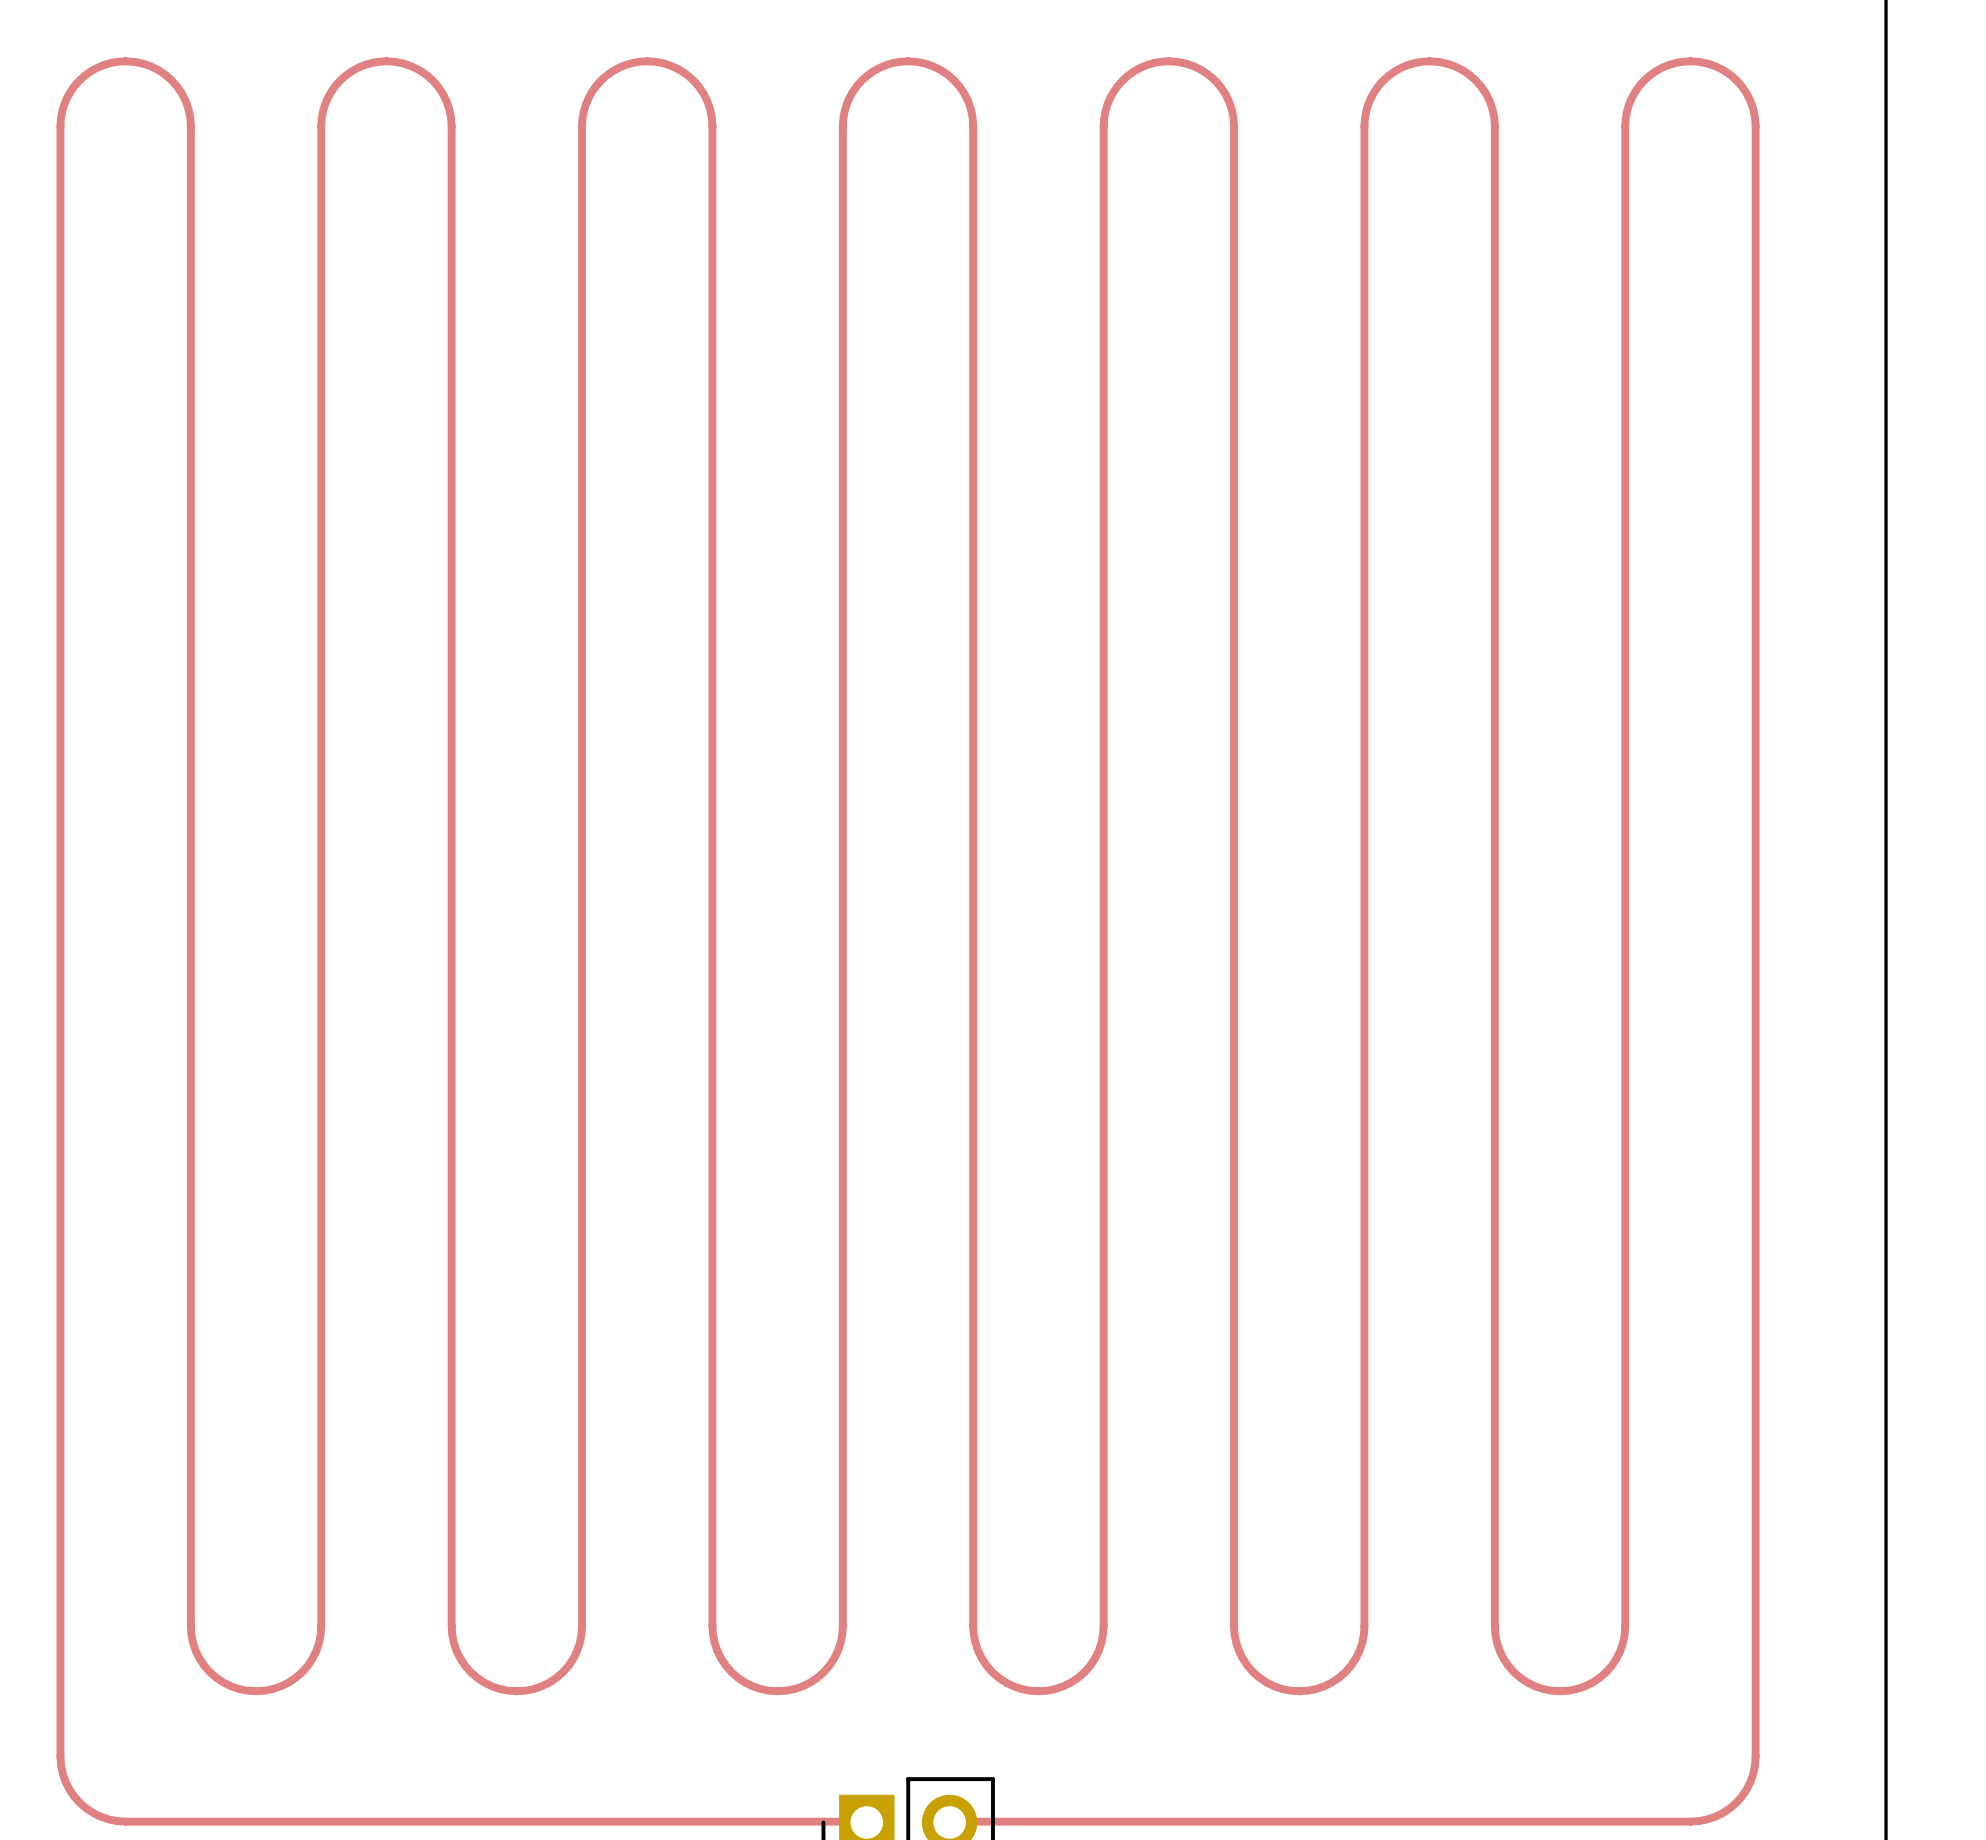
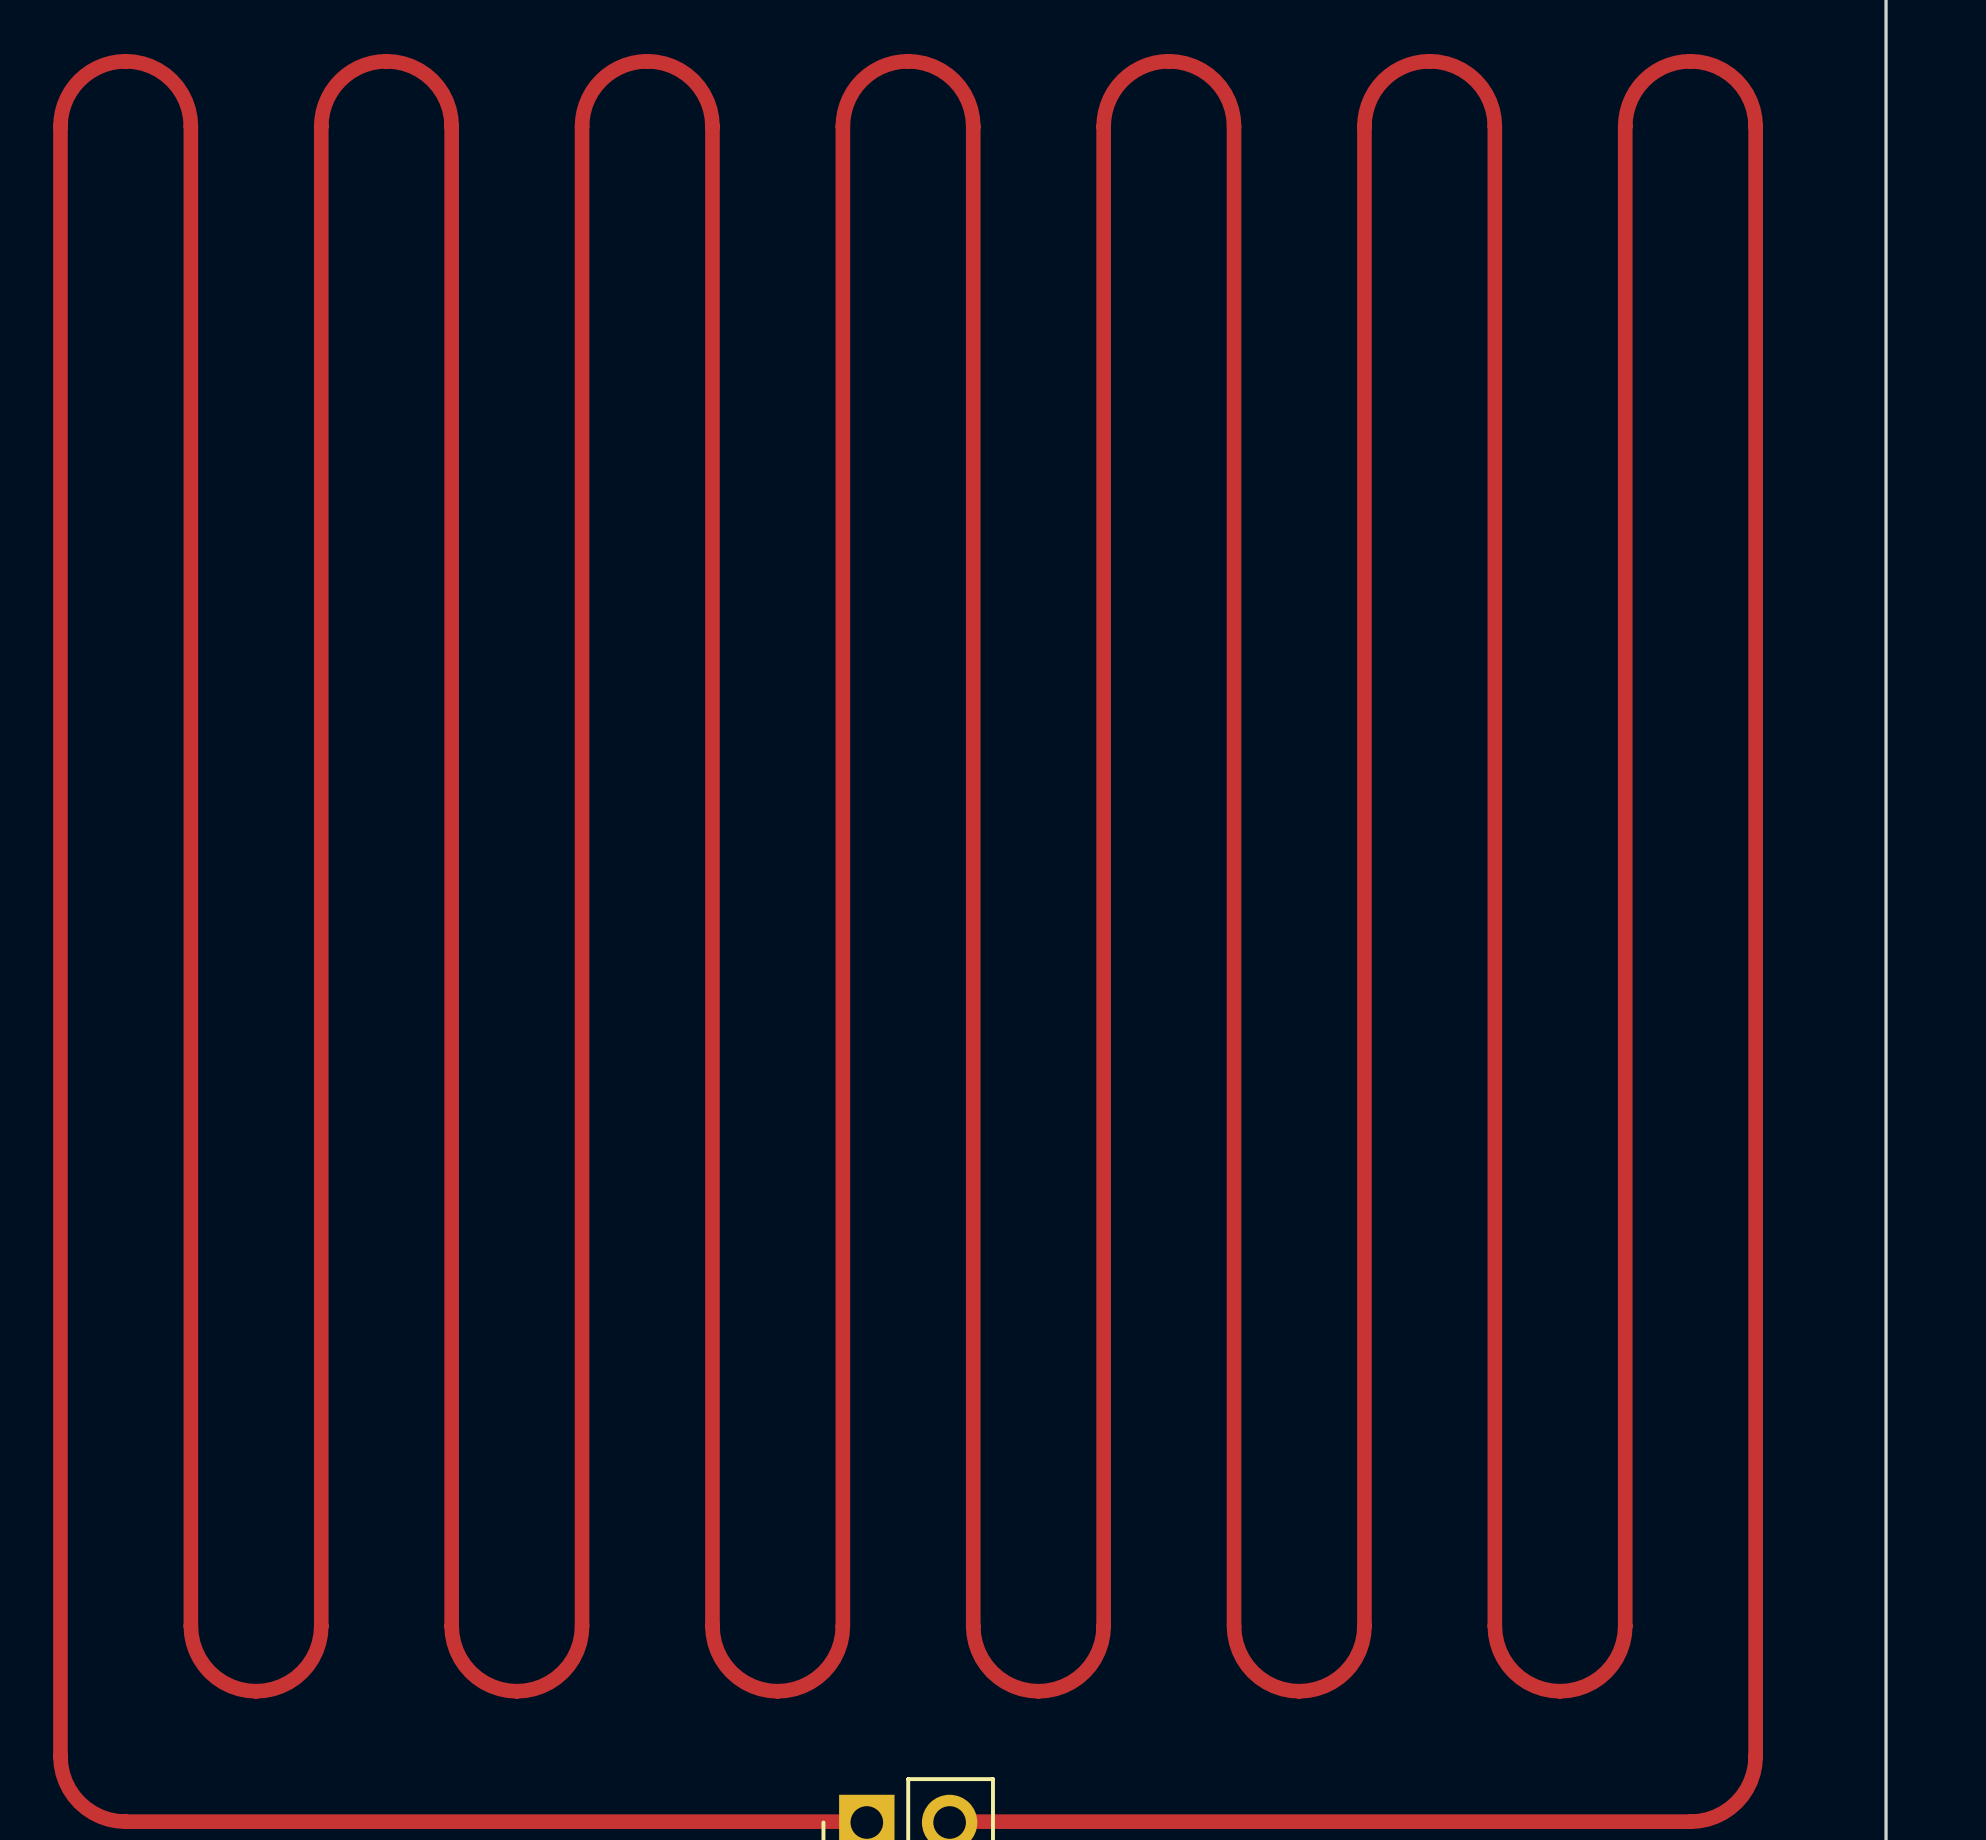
top track width: thin (866, 1822) (125, 1821) (108, 1819) (93, 1812) (73, 1796) (65, 1781) (60, 1756) (60, 126) (62, 111) (70, 91) (79, 80) (97, 67) (111, 62) (125, 61) (142, 63) (158, 70) (177, 86) (185, 101) (190, 117) (190, 1626) (195, 1651) (209, 1672) (231, 1686) (256, 1691) (281, 1686) (302, 1672) (316, 1651) (321, 1626) (321, 126) (322, 111) (327, 98) (340, 80) (358, 67) (371, 62) (394, 61) (411, 66) (426, 74) (438, 86) (446, 101) (451, 117) (451, 1626) (456, 1651) (470, 1672) (491, 1686) (516, 1691) (541, 1686) (562, 1672) (577, 1651) (582, 1626) (582, 126) (585, 104) (596, 85) (606, 75) (625, 64) (647, 61) (664, 63) (679, 70) (693, 80) (707, 101) (711, 117) (712, 1626) (717, 1651) (731, 1672) (752, 1686) (777, 1691) (802, 1686) (823, 1672) (837, 1651) (842, 1626) (842, 126) (846, 104) (852, 91) (867, 75) (886, 64) (908, 61) (924, 63) (947, 74) (959, 86) (968, 101) (972, 117) (973, 1626) (978, 1651) (992, 1672) (1013, 1686) (1038, 1691) (1063, 1686) (1084, 1672) (1098, 1651) (1103, 1626) (1103, 126) (1105, 111) (1110, 98) (1122, 80) (1140, 67) (1161, 61) (1177, 61) (1201, 70) (1214, 80) (1229, 101) (1233, 117) (1234, 1626) (1239, 1651) (1253, 1672) (1274, 1686) (1299, 1691) (1324, 1686) (1345, 1672) (1359, 1651) (1364, 1626) (1364, 126) (1366, 111) (1374, 91) (1388, 75) (1408, 64) (1429, 61) (1454, 66) (1475, 80) (1486, 93) (1494, 117) (1494, 1626) (1499, 1651) (1513, 1672) (1535, 1686) (1560, 1691) (1584, 1686) (1606, 1672) (1620, 1651) (1625, 1626) (1625, 119) (1631, 98) (1644, 80) (1662, 67) (1683, 61) (1707, 63) (1723, 70) (1742, 86) (1750, 101) (1755, 126) (1755, 1756) (1750, 1781) (1736, 1802) (1723, 1812) (1707, 1819) (1690, 1821) (950, 1822) -> thick (866, 1822) (125, 1821) (108, 1819) (93, 1812) (73, 1796) (65, 1781) (60, 1756) (60, 126) (62, 111) (70, 91) (79, 80) (97, 67) (111, 62) (125, 61) (142, 63) (158, 70) (177, 86) (185, 101) (190, 117) (190, 1626) (195, 1651) (209, 1672) (231, 1686) (256, 1691) (281, 1686) (302, 1672) (316, 1651) (321, 1626) (321, 126) (322, 111) (327, 98) (340, 80) (358, 67) (371, 62) (394, 61) (411, 66) (426, 74) (438, 86) (446, 101) (451, 117) (451, 1626) (456, 1651) (470, 1672) (491, 1686) (516, 1691) (541, 1686) (562, 1672) (577, 1651) (582, 1626) (582, 126) (585, 104) (596, 85) (606, 75) (625, 64) (647, 61) (664, 63) (679, 70) (693, 80) (707, 101) (711, 117) (712, 1626) (717, 1651) (731, 1672) (752, 1686) (777, 1691) (802, 1686) (823, 1672) (837, 1651) (842, 1626) (842, 126) (846, 104) (852, 91) (867, 75) (886, 64) (908, 61) (924, 63) (947, 74) (959, 86) (968, 101) (972, 117) (973, 1626) (978, 1651) (992, 1672) (1013, 1686) (1038, 1691) (1063, 1686) (1084, 1672) (1098, 1651) (1103, 1626) (1103, 126) (1105, 111) (1110, 98) (1122, 80) (1140, 67) (1161, 61) (1177, 61) (1201, 70) (1214, 80) (1229, 101) (1233, 117) (1234, 1626) (1239, 1651) (1253, 1672) (1274, 1686) (1299, 1691) (1324, 1686) (1345, 1672) (1359, 1651) (1364, 1626) (1364, 126) (1366, 111) (1374, 91) (1388, 75) (1408, 64) (1429, 61) (1454, 66) (1475, 80) (1486, 93) (1494, 117) (1494, 1626) (1499, 1651) (1513, 1672) (1535, 1686) (1560, 1691) (1584, 1686) (1606, 1672) (1620, 1651) (1625, 1626) (1625, 119) (1631, 98) (1644, 80) (1662, 67) (1683, 61) (1707, 63) (1723, 70) (1742, 86) (1750, 101) (1755, 126) (1755, 1756) (1750, 1781) (1736, 1802) (1723, 1812) (1707, 1819) (1690, 1821) (950, 1822)

